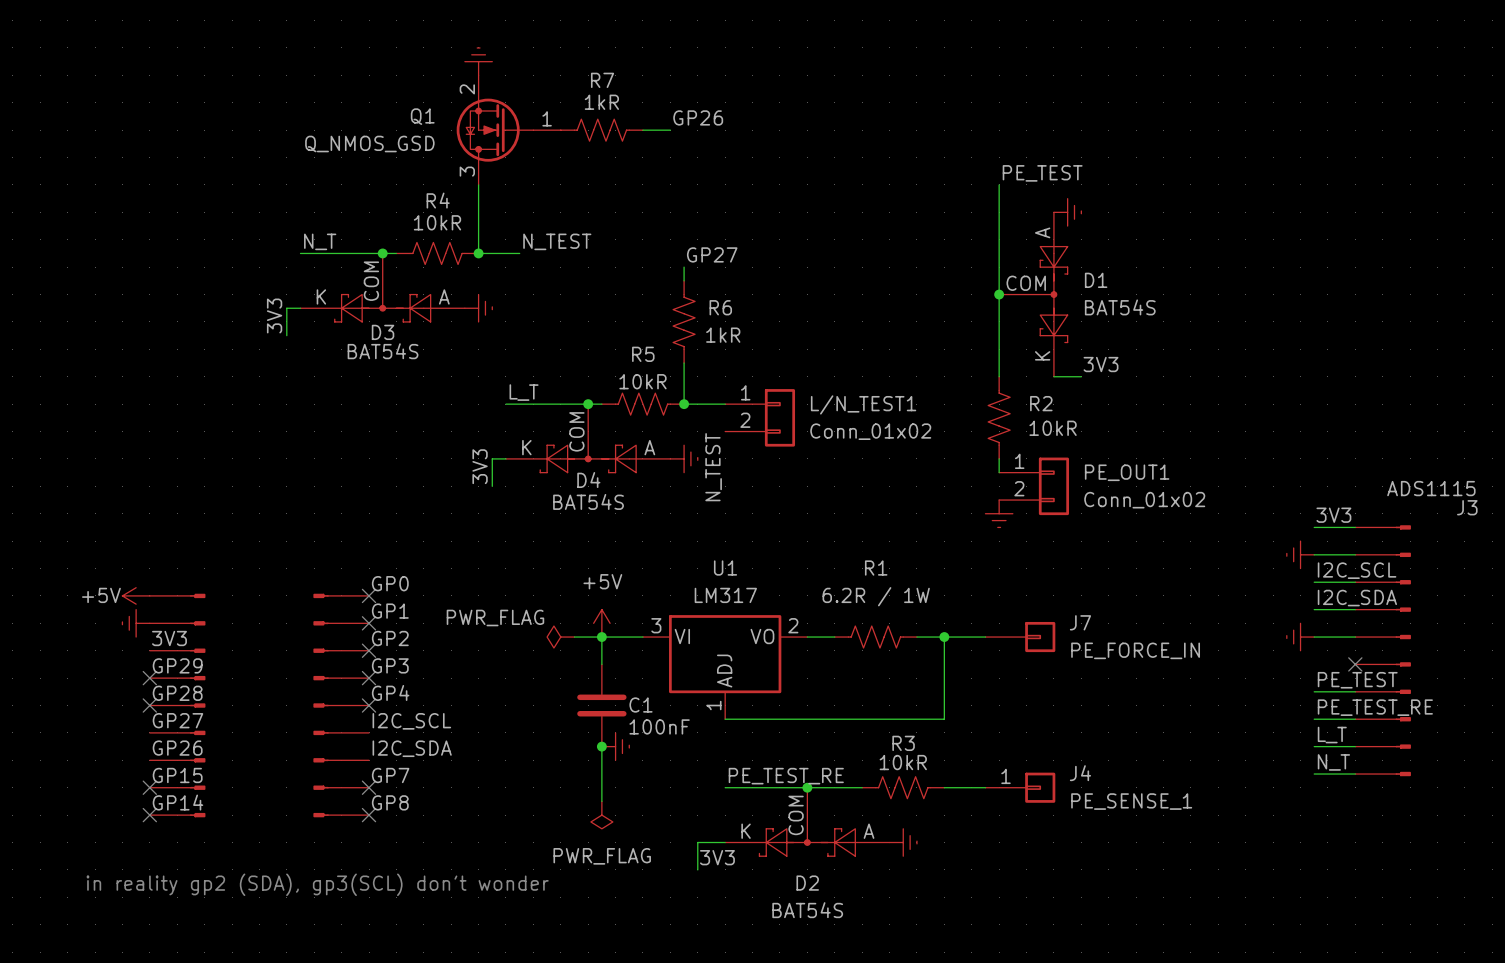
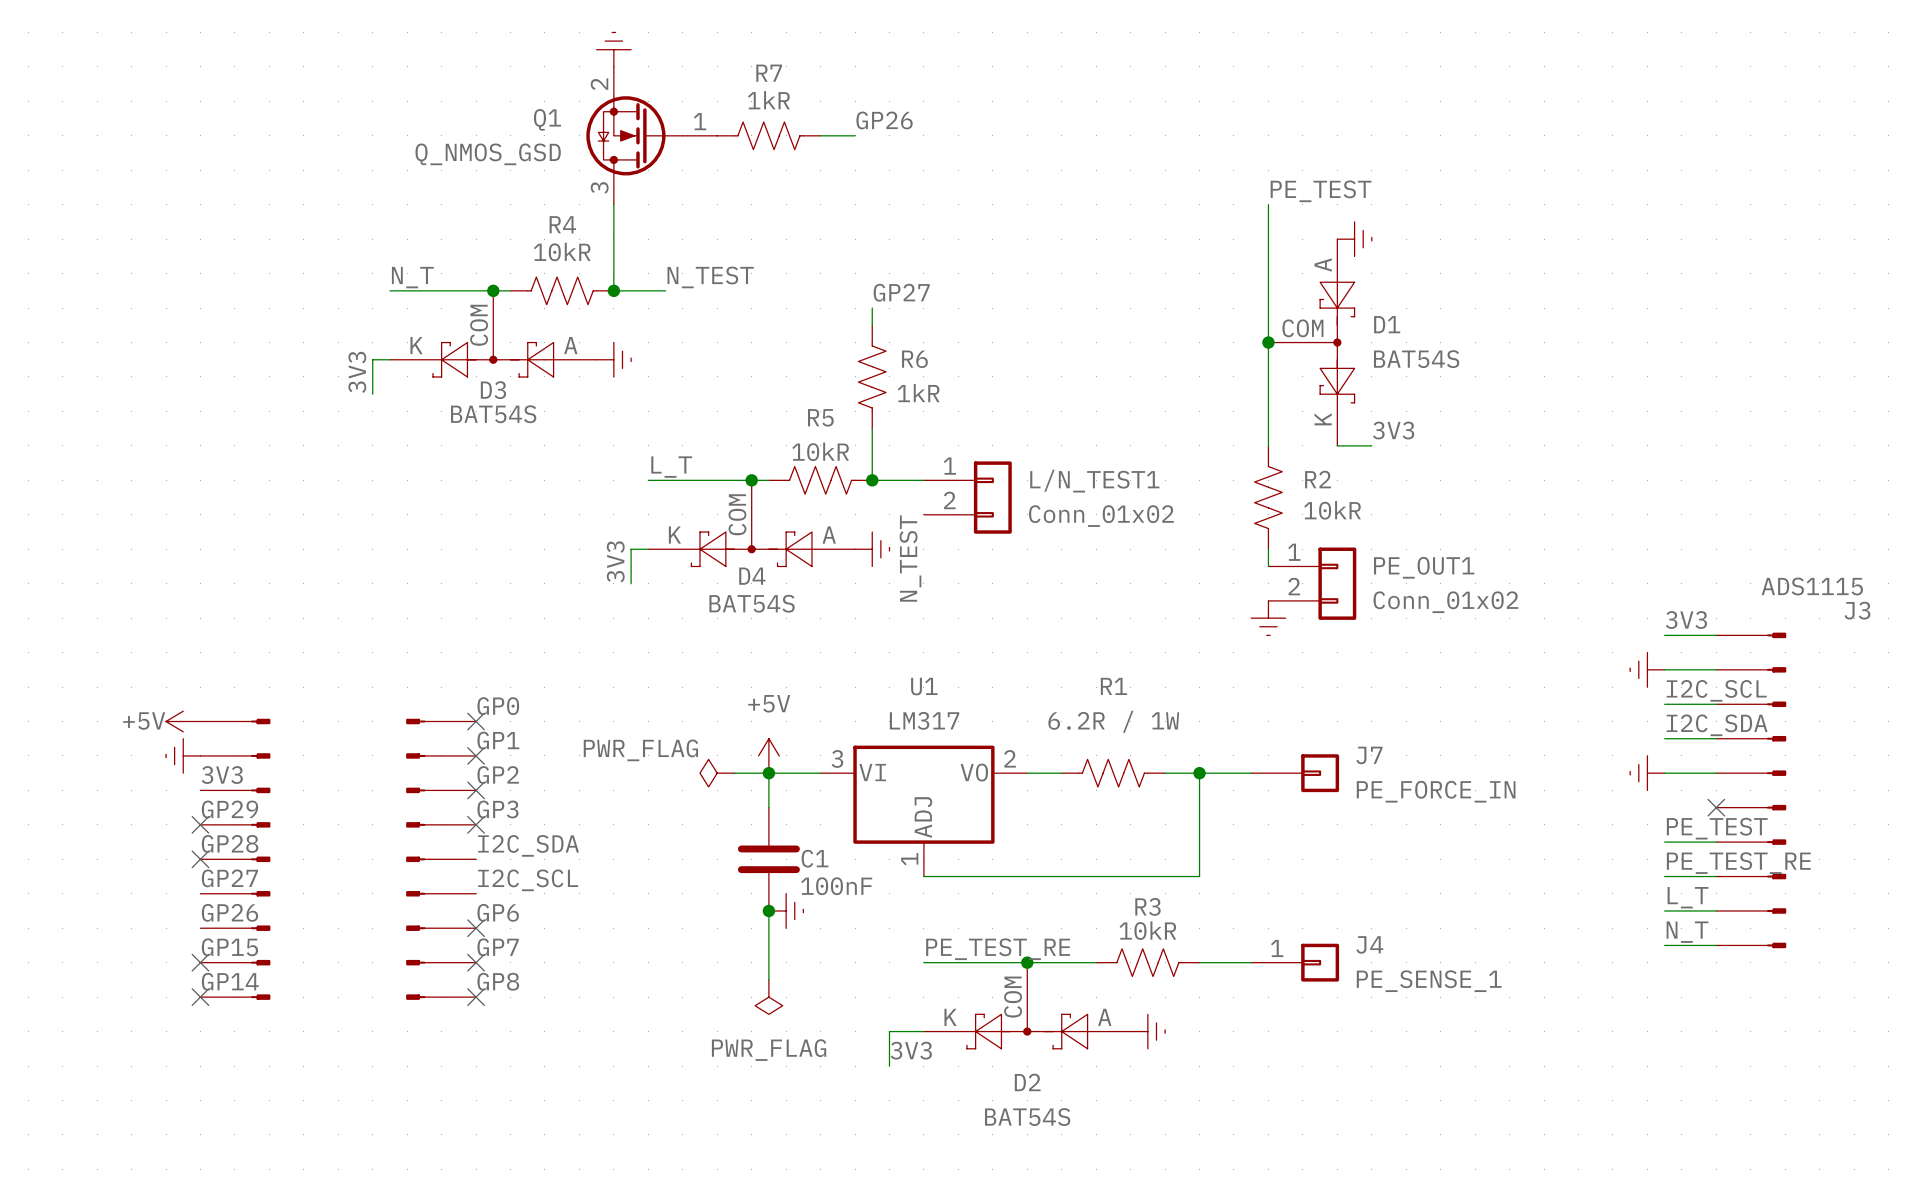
label: GP4 (390, 692) -> I2C_SDA (528, 845)
no-connect mark position: (369, 705) -> (476, 928)
label: I2C_SDA (412, 748) -> GP6 (498, 912)
text: in reality gp2 (SDA), gp3(SCL) don't wonder (317, 884) -> none

